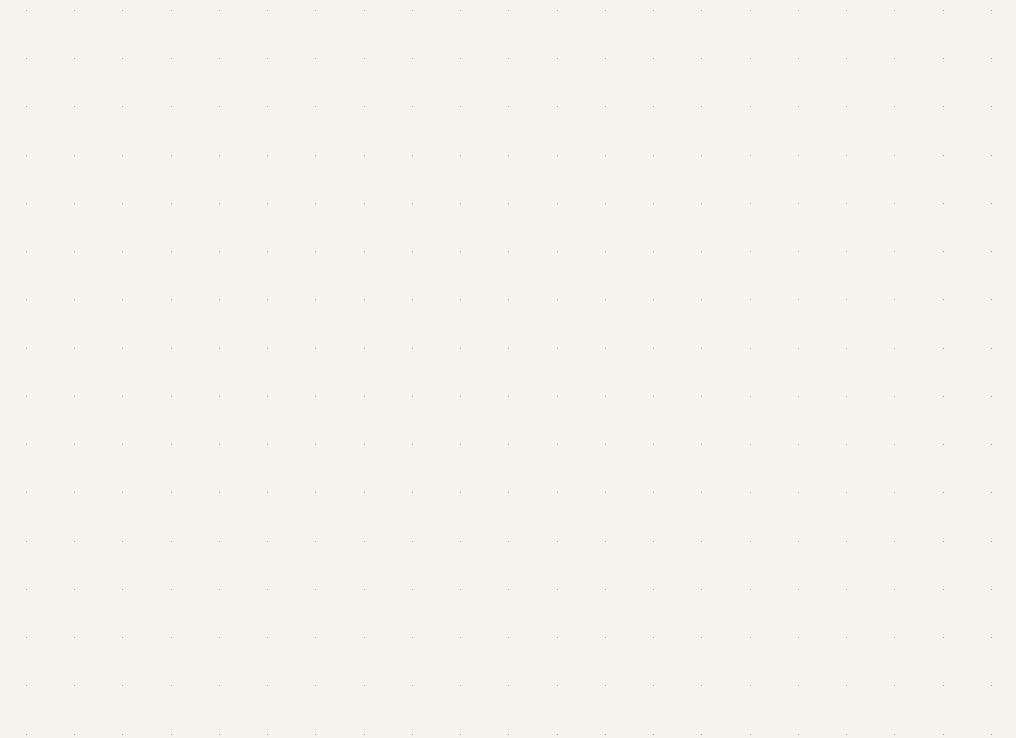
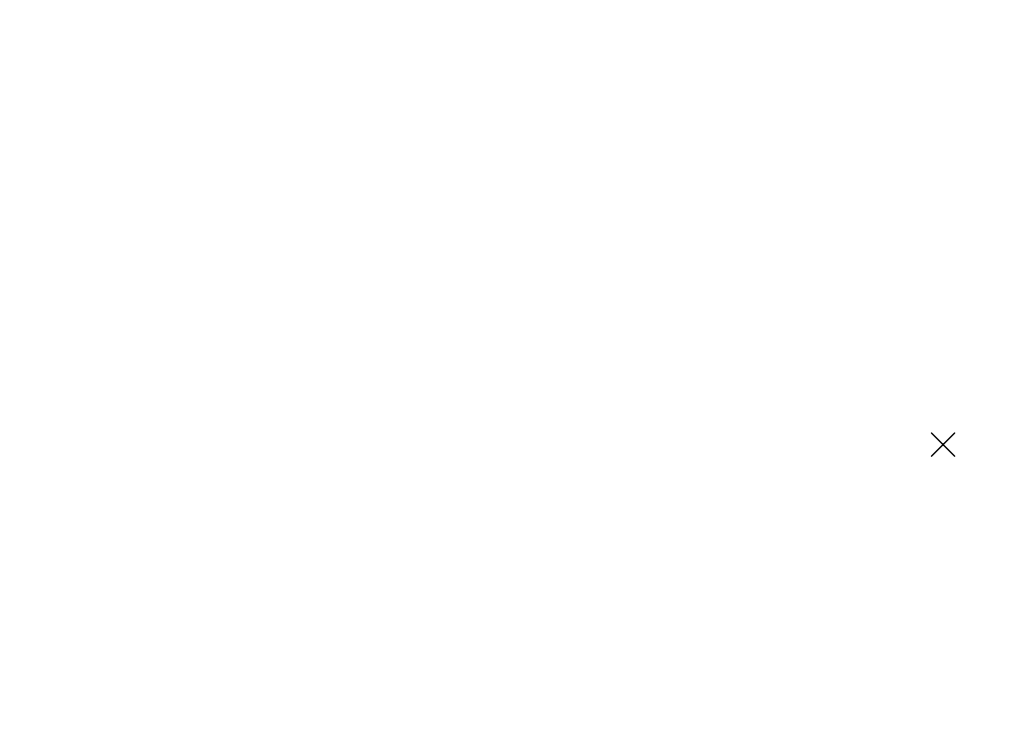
no-connect mark: none -> (943, 444)

